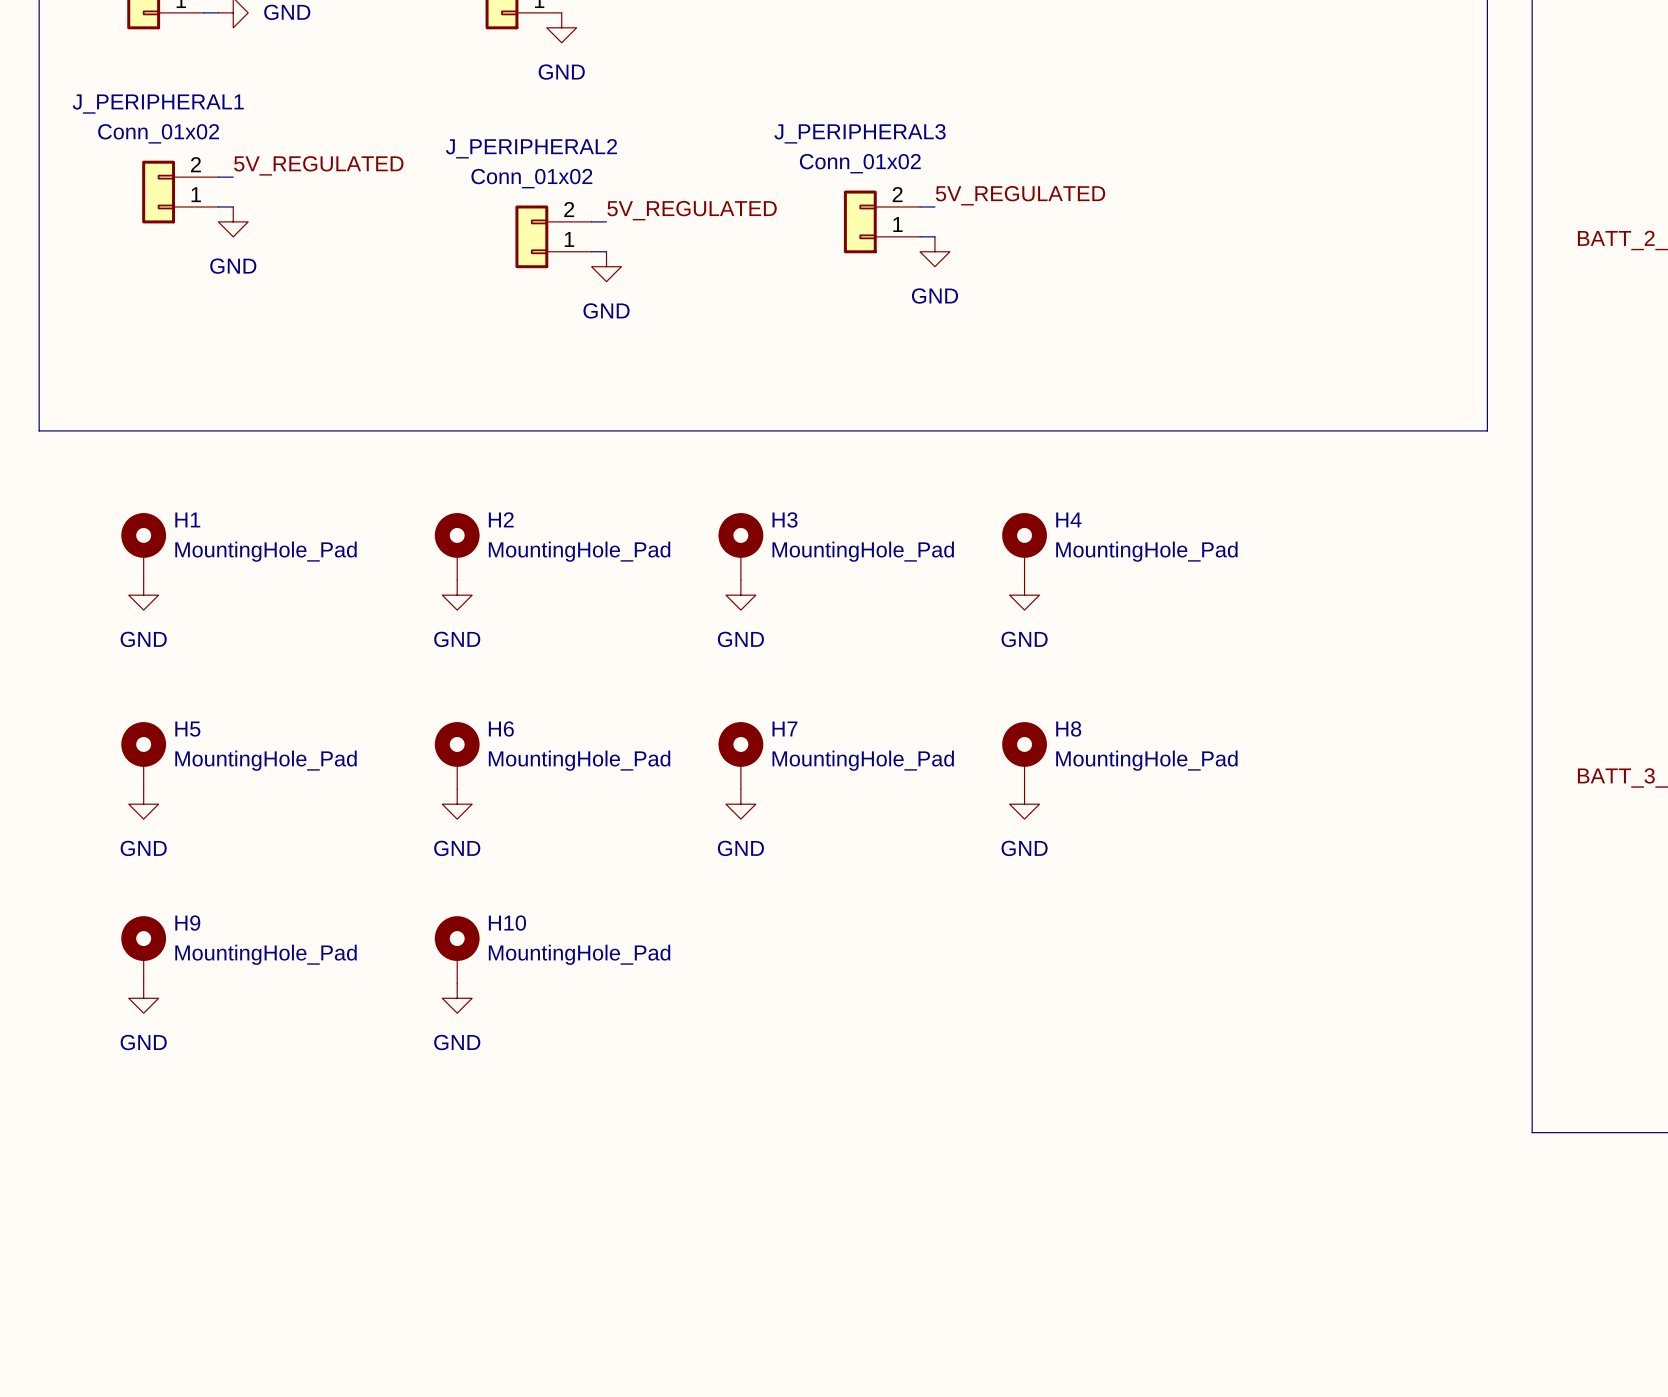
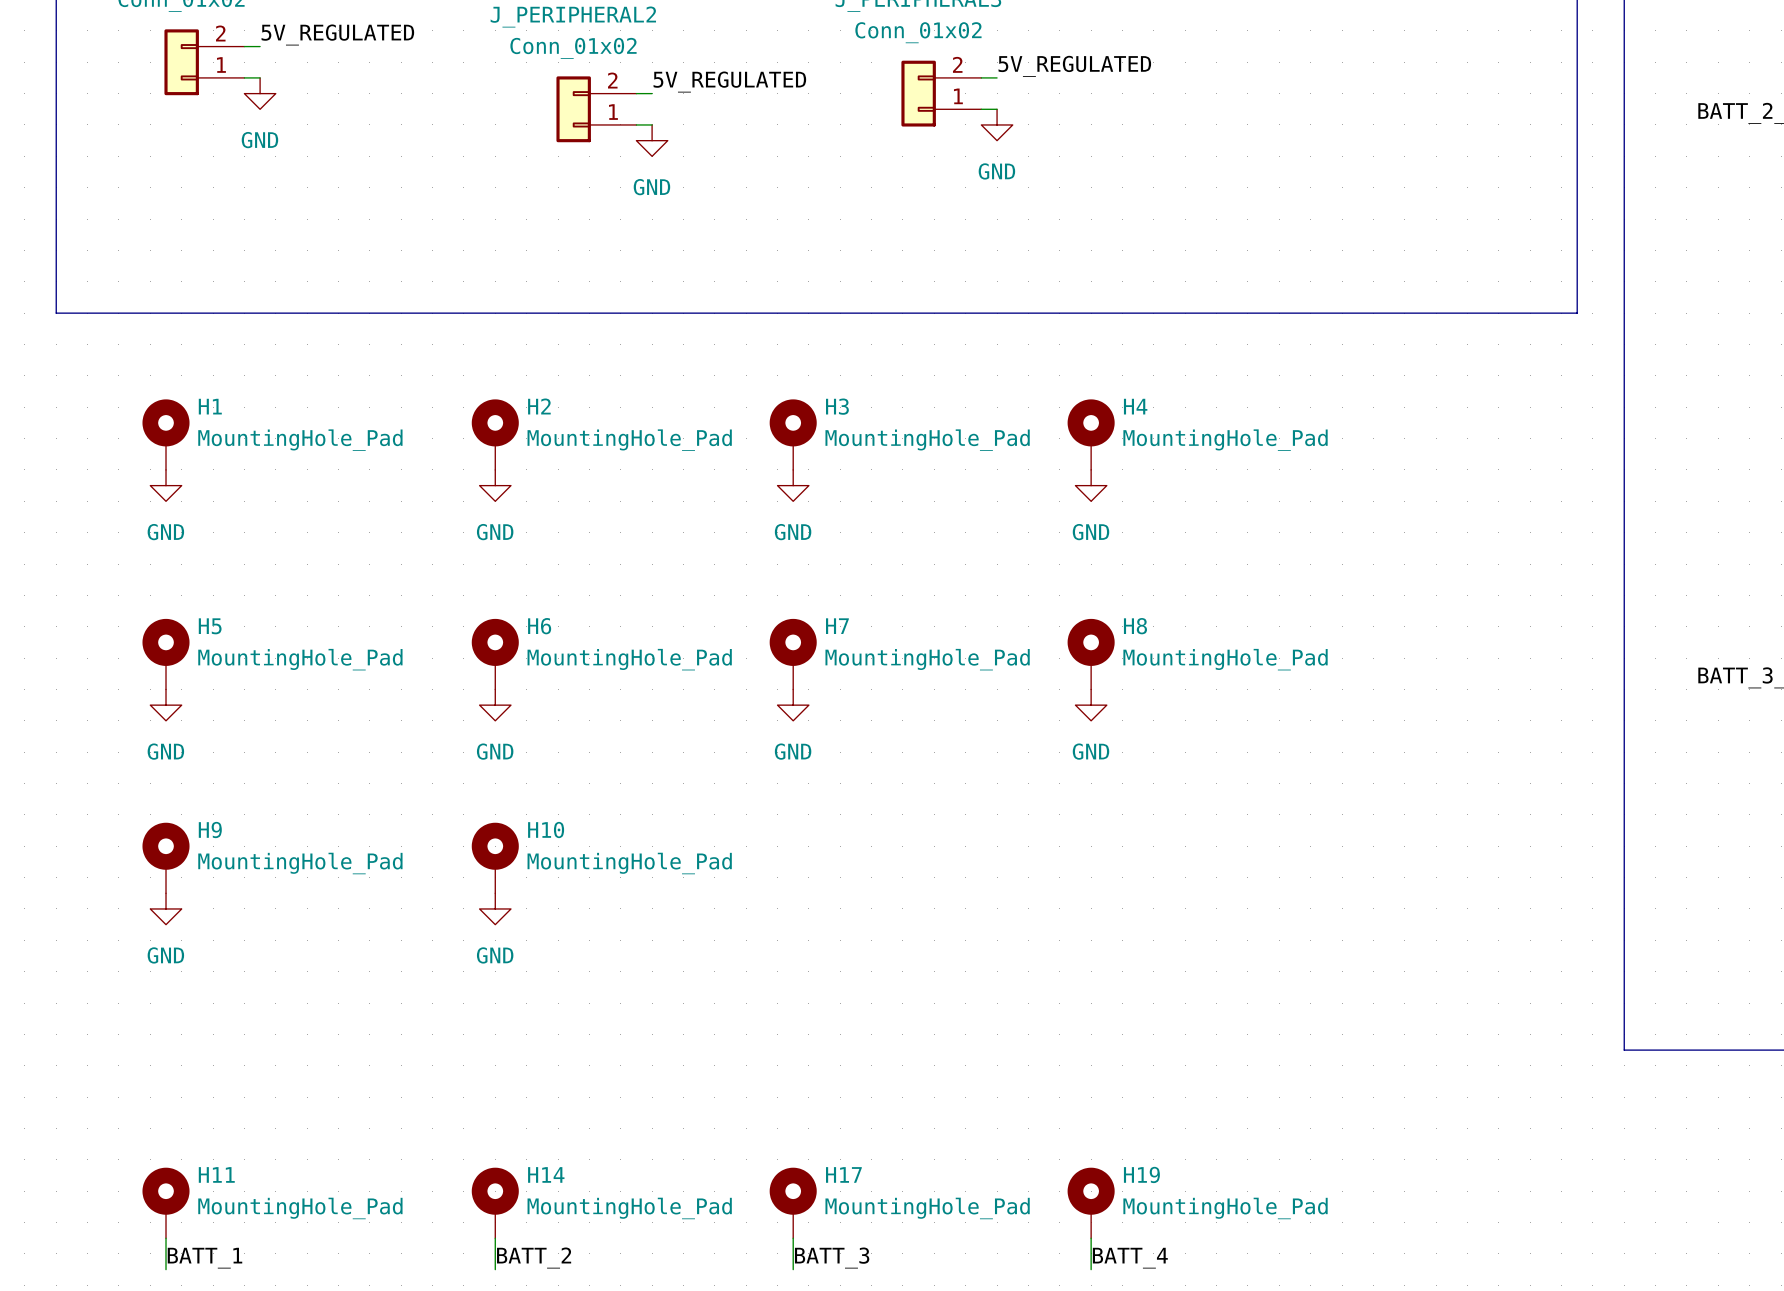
H11: none -> MountingHole_Pad (166, 1202)
H14: none -> MountingHole_Pad (495, 1202)
H17: none -> MountingHole_Pad (793, 1202)
H19: none -> MountingHole_Pad (1091, 1202)
wire: none -> (166, 1238) (166, 1269)
wire: none -> (495, 1238) (495, 1269)
wire: none -> (793, 1238) (793, 1269)
wire: none -> (1091, 1238) (1091, 1269)
label: none -> BATT_1 (204, 1258)
label: none -> BATT_2 (534, 1258)
label: none -> BATT_3 (832, 1258)
label: none -> BATT_4 (1130, 1258)

